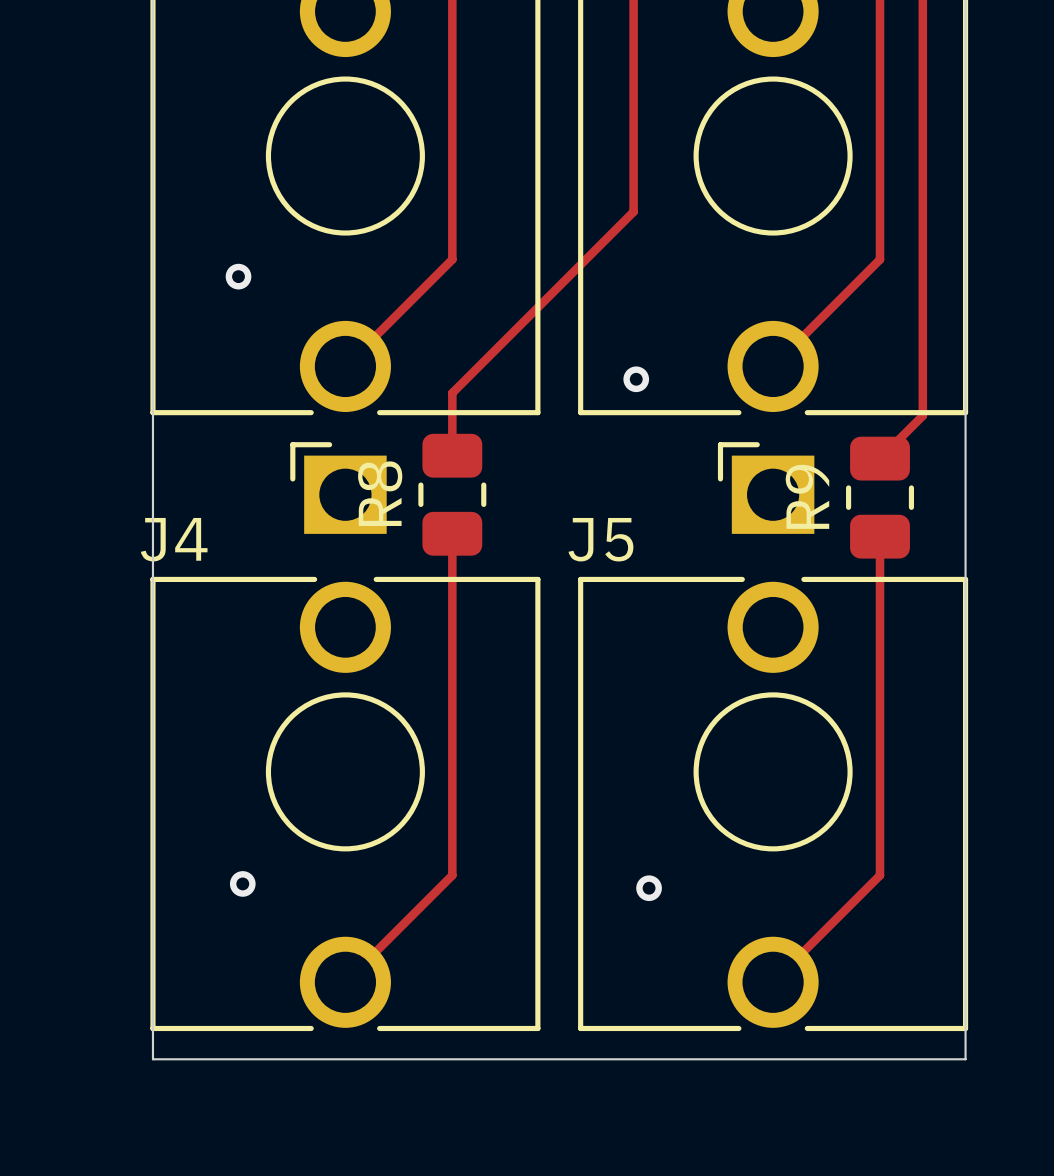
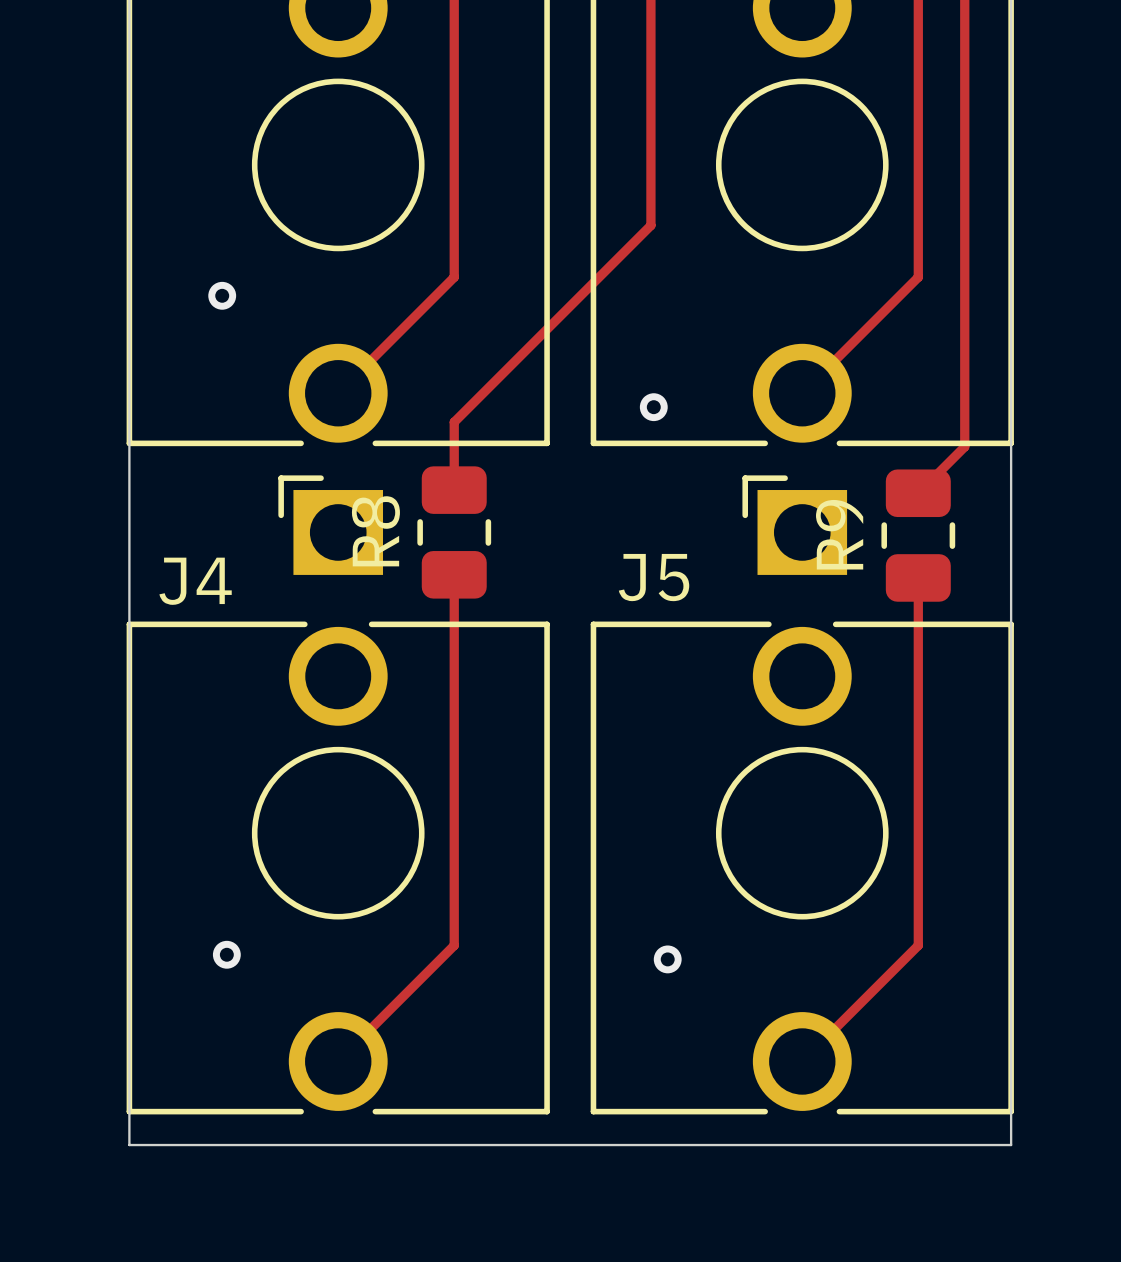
J4 name position: J4 (174, 539) -> J4 (195, 581)
J5 name position: J5 (600, 539) -> J5 (654, 577)

